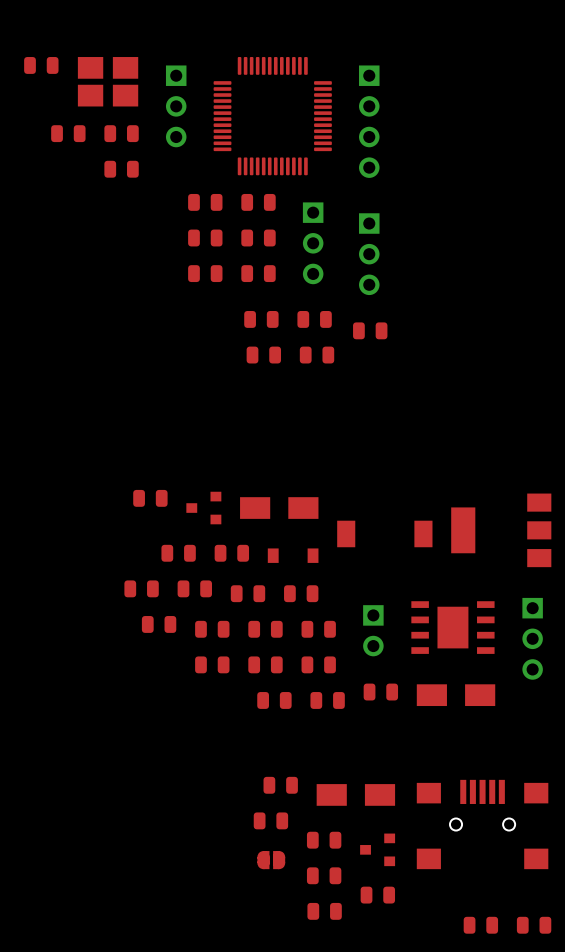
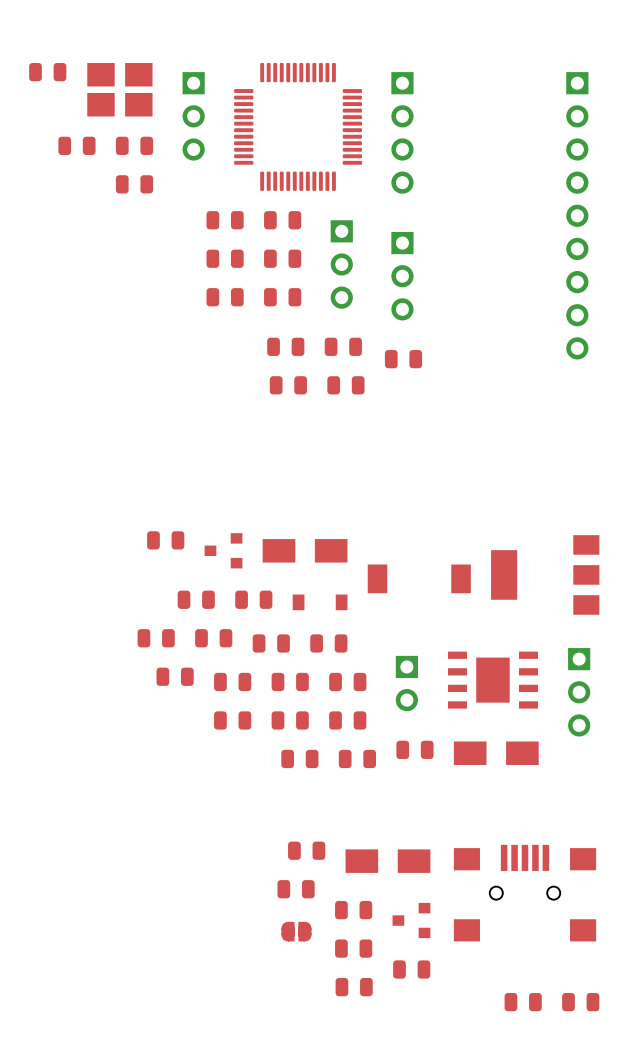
part: none -> (577, 215)

